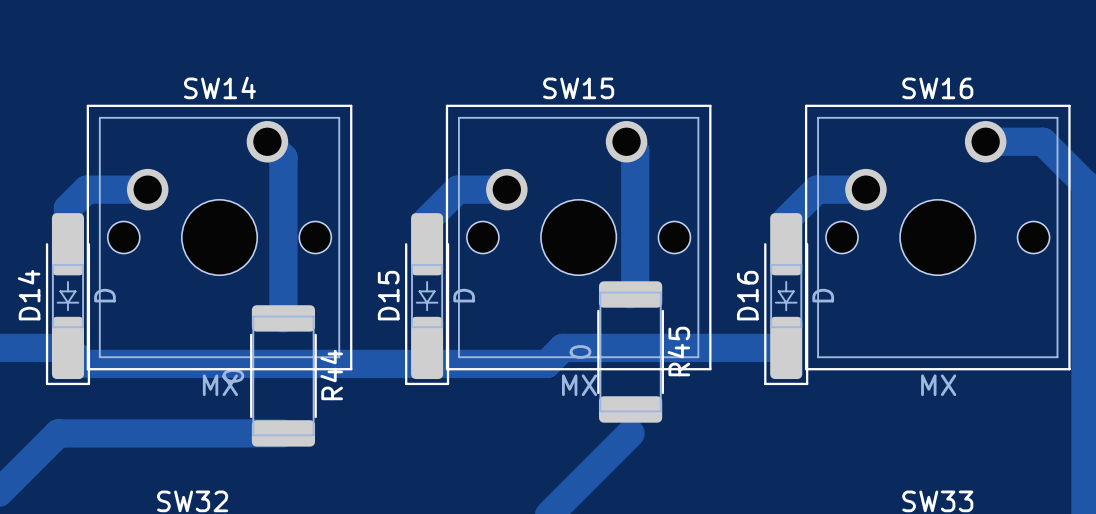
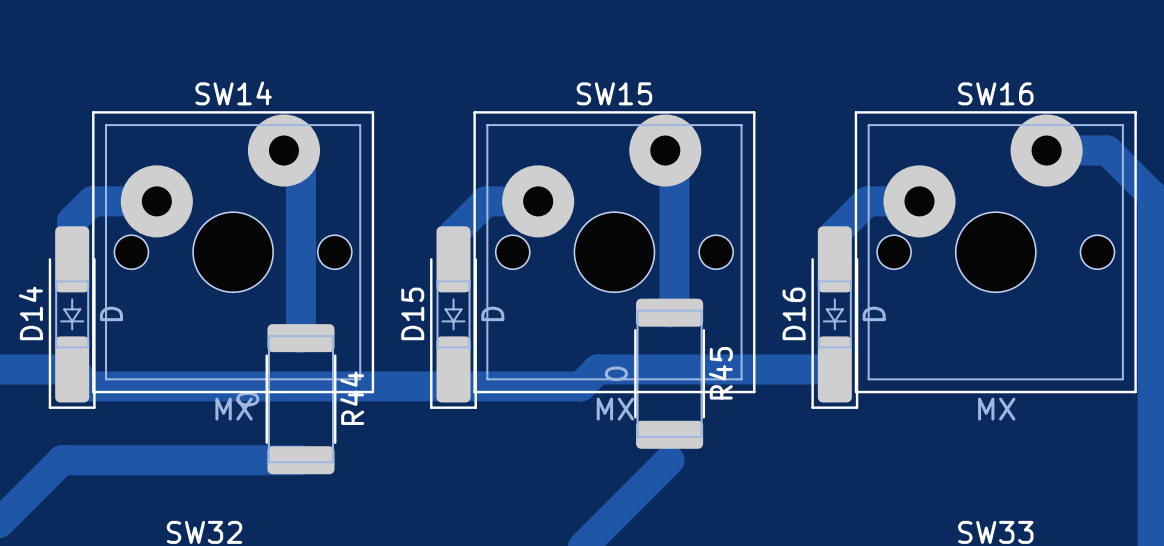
SW14 footprint: [86, 104, 353, 371] -> [92, 111, 375, 394]
SW15 footprint: [445, 104, 712, 371] -> [473, 111, 756, 394]
SW16 footprint: [804, 104, 1071, 371] -> [854, 111, 1137, 394]

